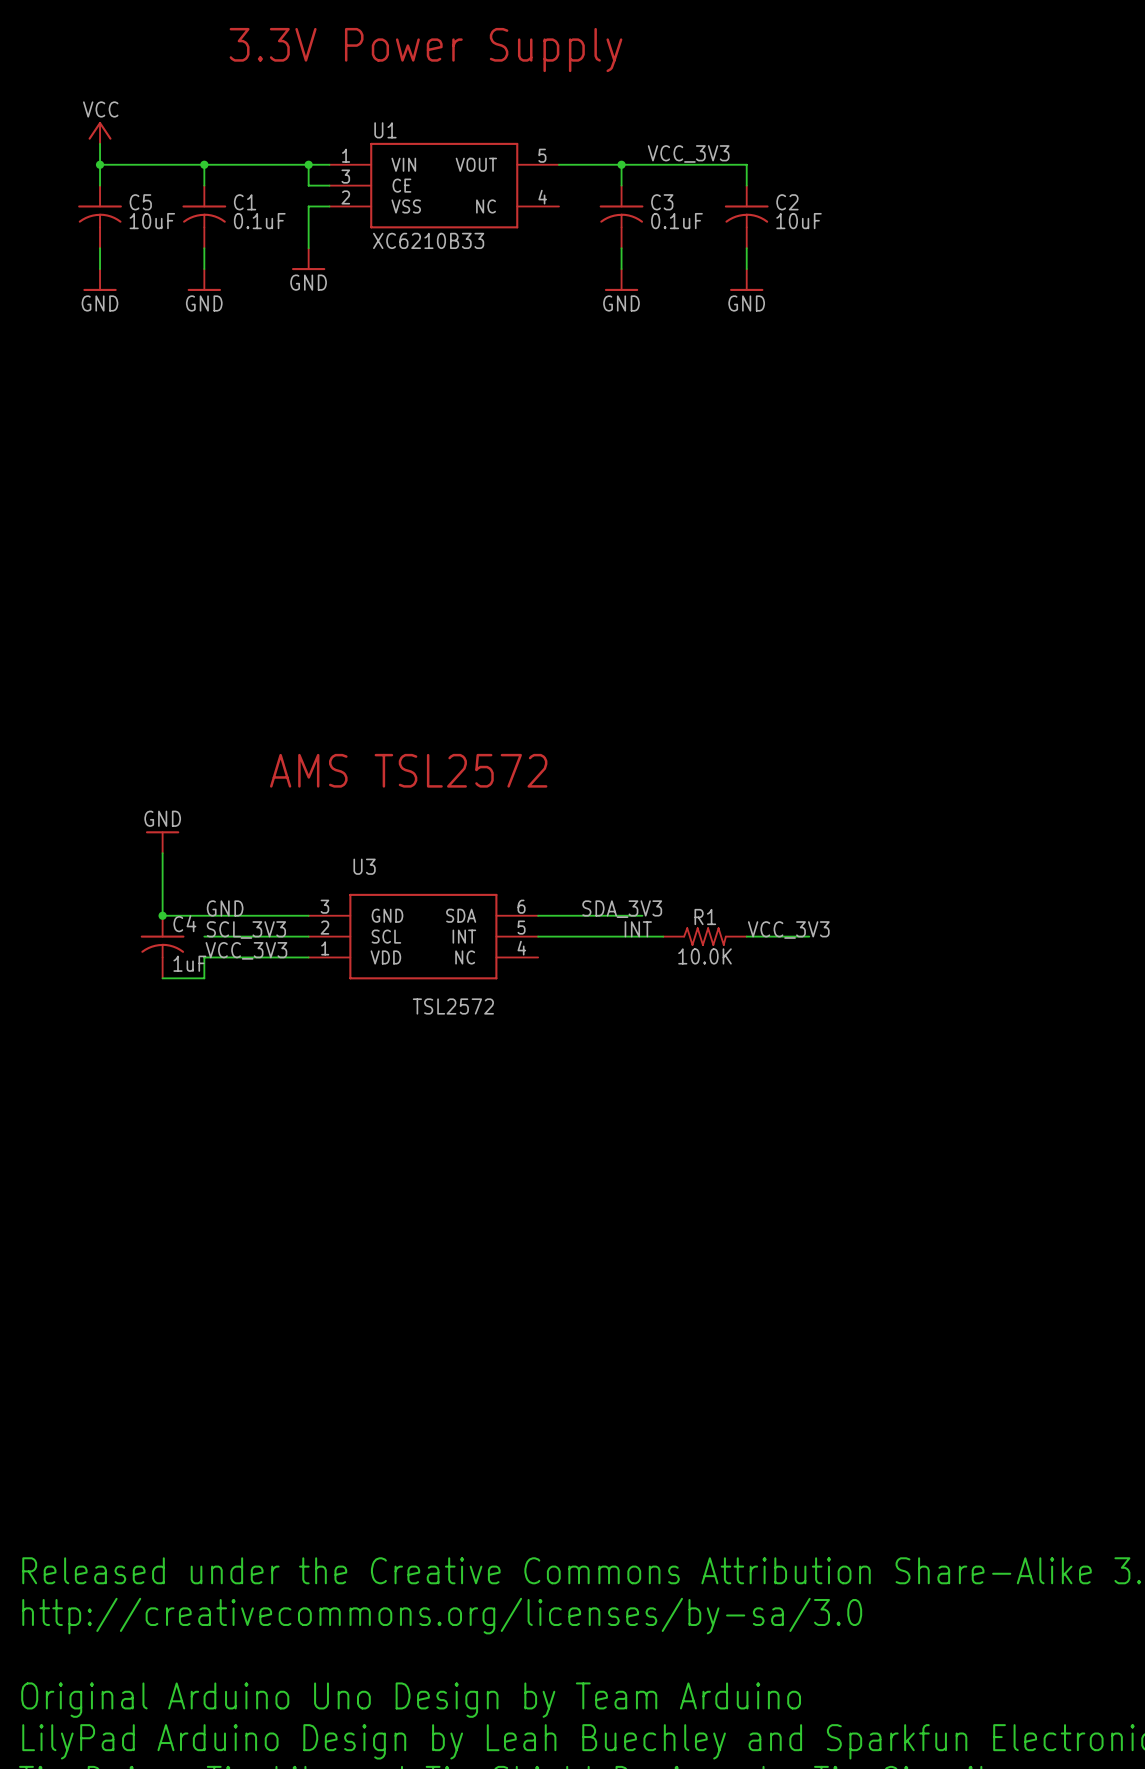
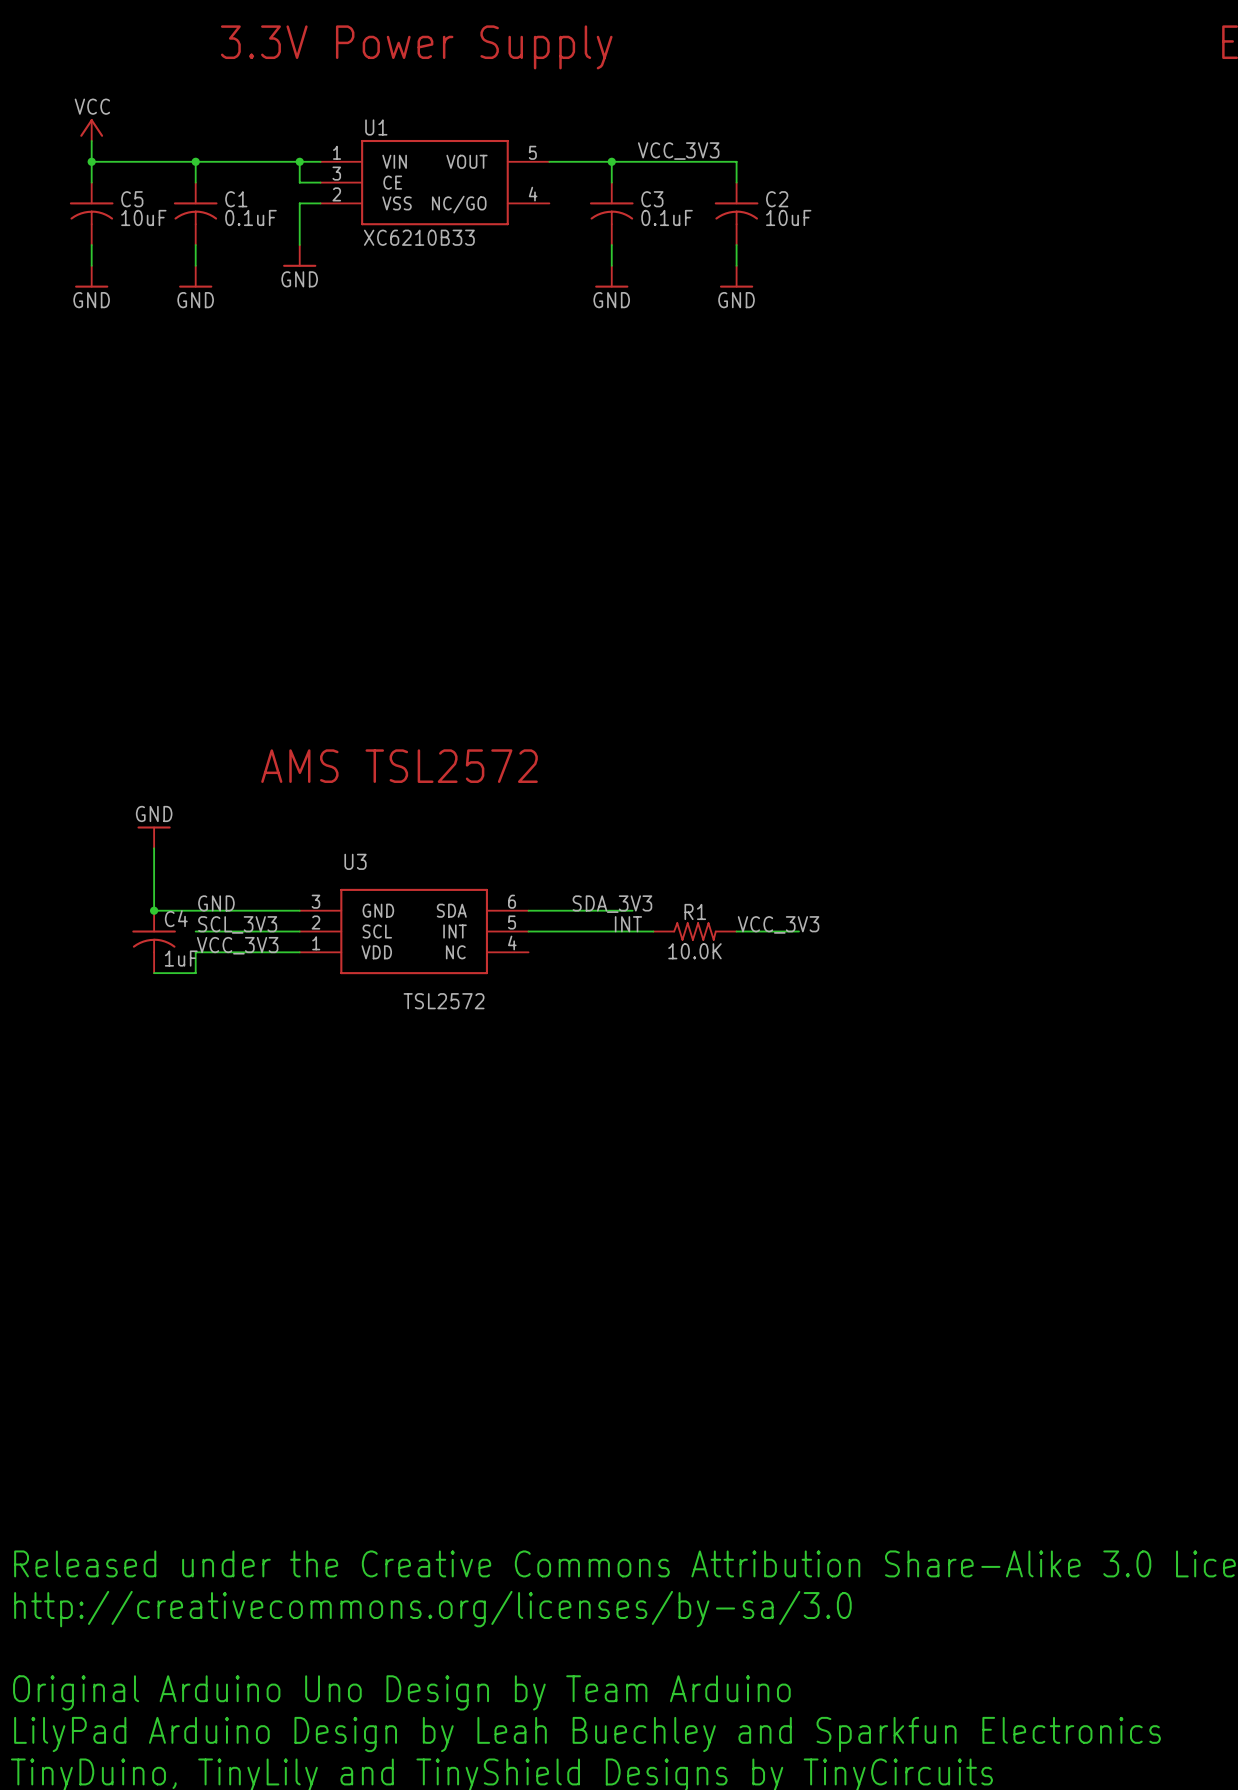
U1 pin name: NC (486, 206) -> NC/GO (459, 204)

